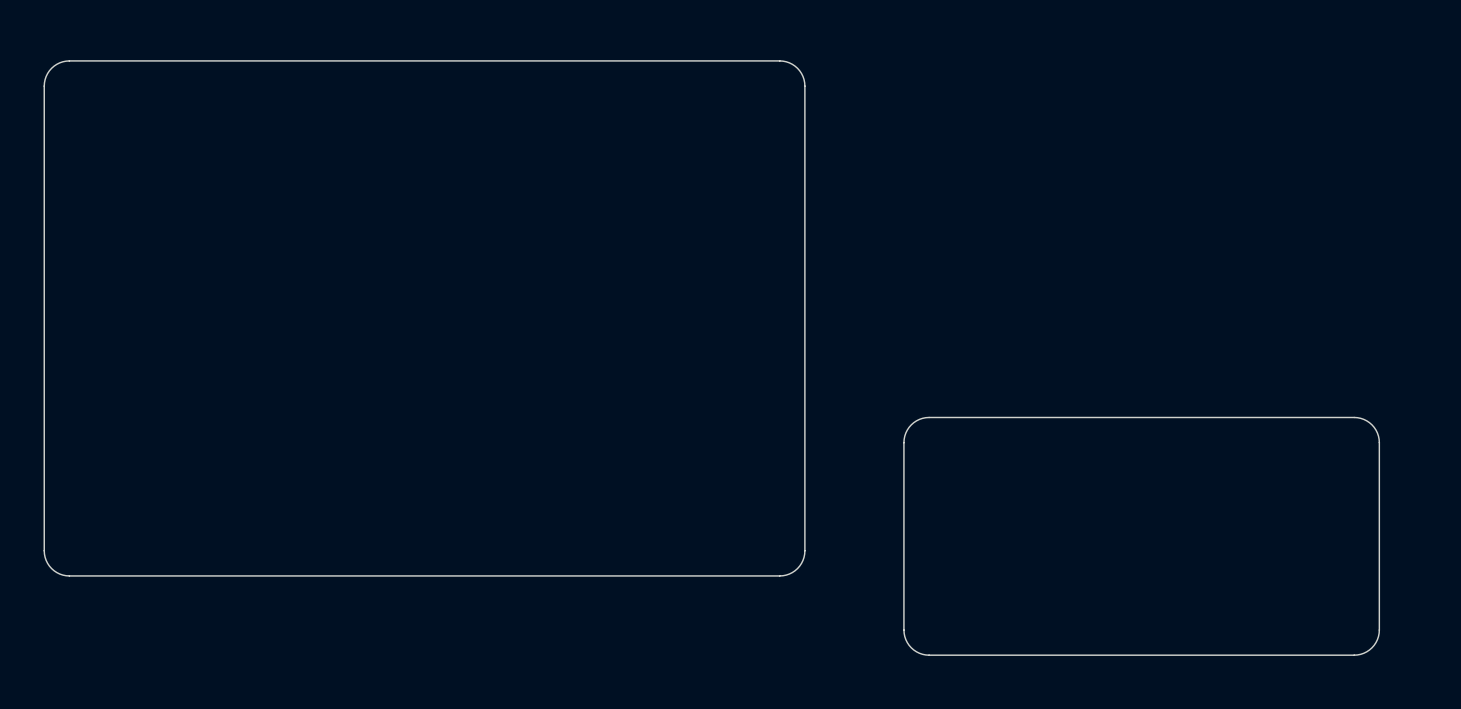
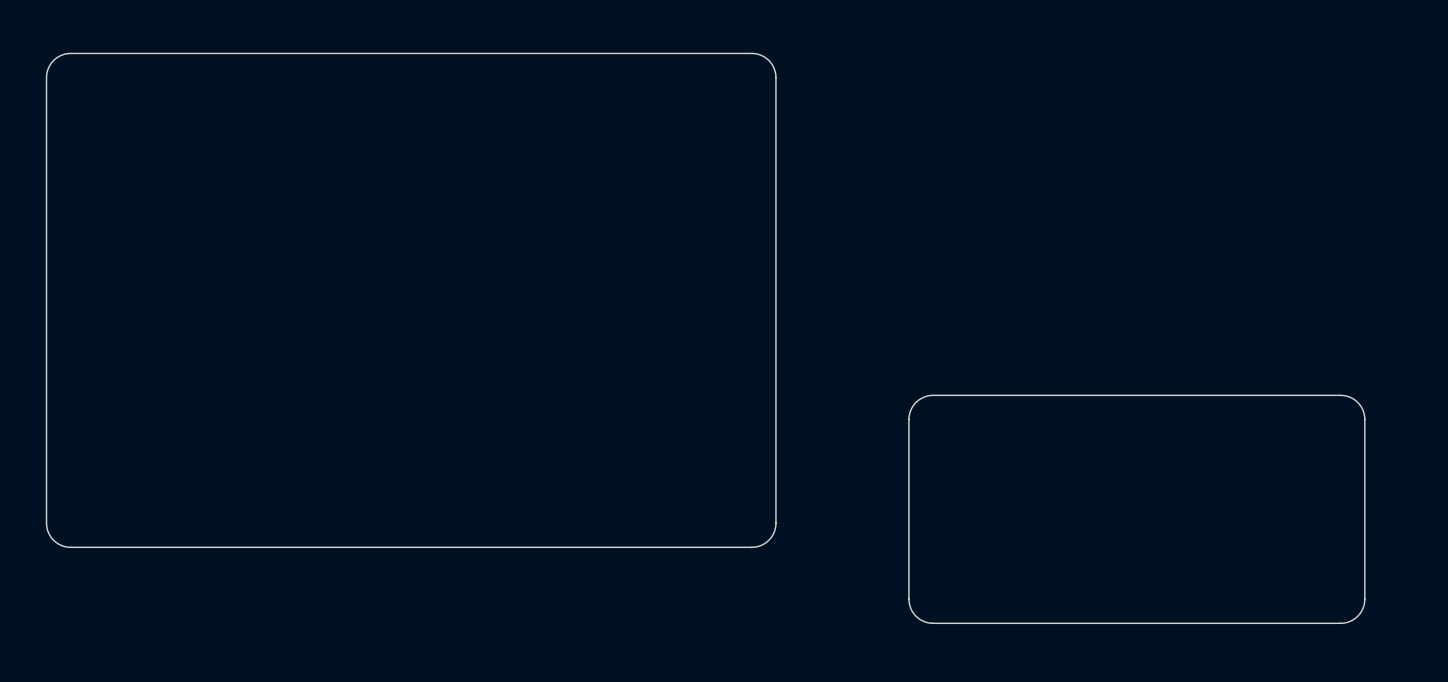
board edge: (968, 417) (929, 417) (919, 419) (909, 427) (903, 442) (904, 636) (911, 647) (922, 654) (968, 655) -> (933, 395) (923, 397) (916, 402) (910, 410) (908, 419) (909, 602) (912, 611) (918, 618) (933, 623)
board edge: (1354, 417) (1363, 419) (1371, 424) (1377, 433) (1379, 442) (1379, 633) (1375, 642) (1369, 649) (1354, 655) -> (1302, 395) (1349, 397) (1359, 404) (1364, 419) (1364, 605) (1357, 616) (1346, 622) (1302, 623)

